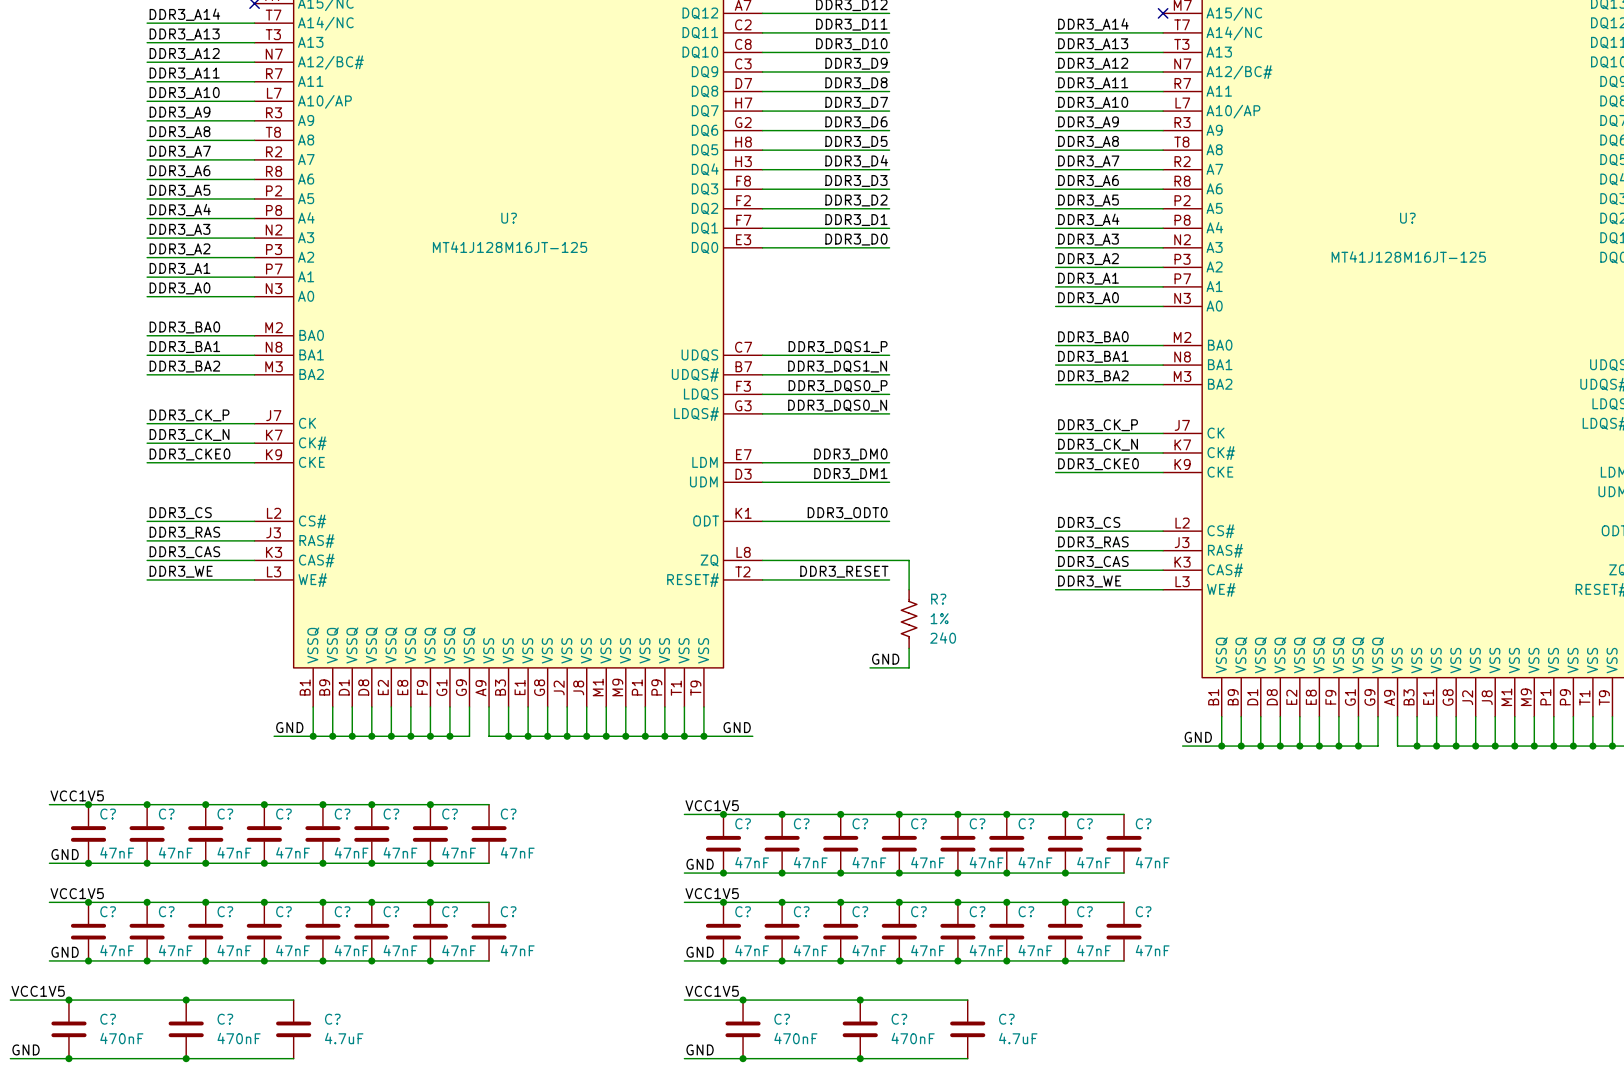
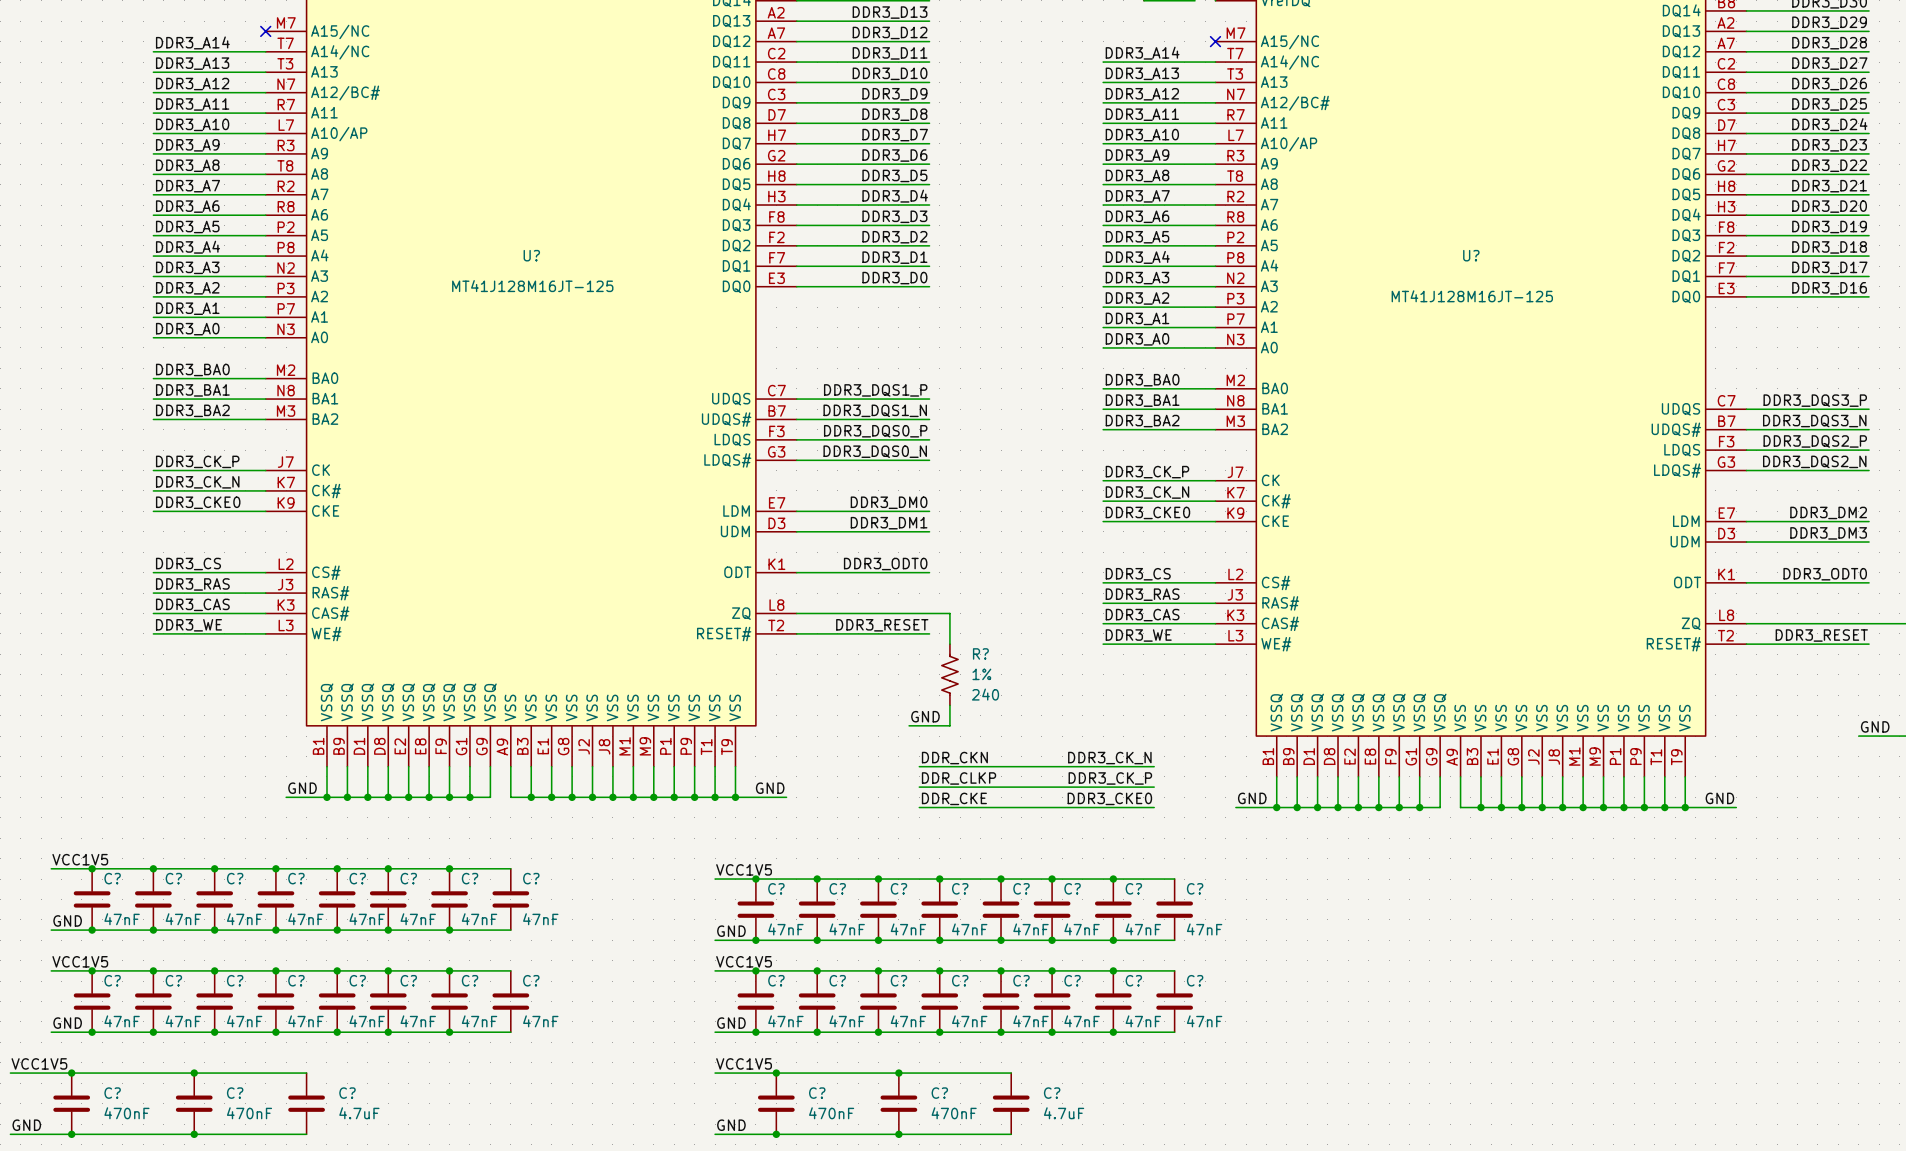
label: none -> DDR_CKN (954, 758)
label: none -> DDR3_CK_N (1109, 758)
wire: none -> (919, 766) (1154, 766)
label: none -> DDR_CLKP (959, 778)
label: none -> DDR3_CK_P (1110, 778)
wire: none -> (919, 787) (1154, 787)
label: none -> DDR_CKE (954, 798)
label: none -> DDR3_CKE0 (1109, 798)
wire: none -> (919, 807) (1154, 807)

